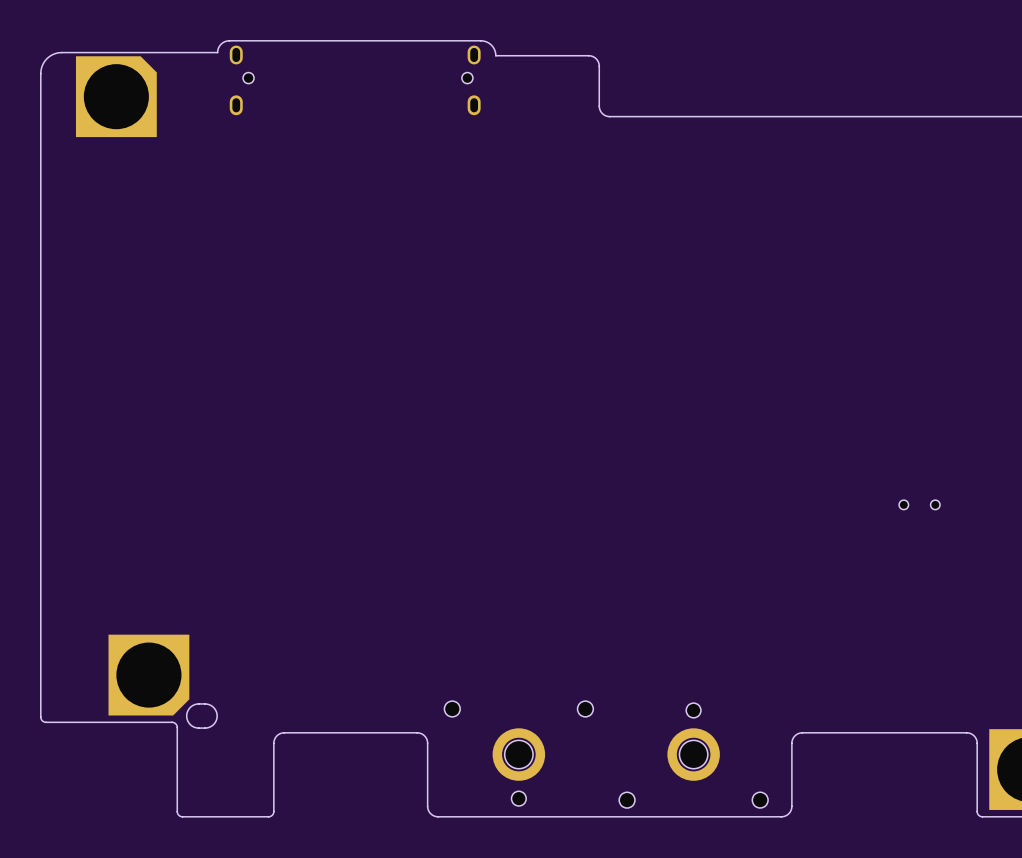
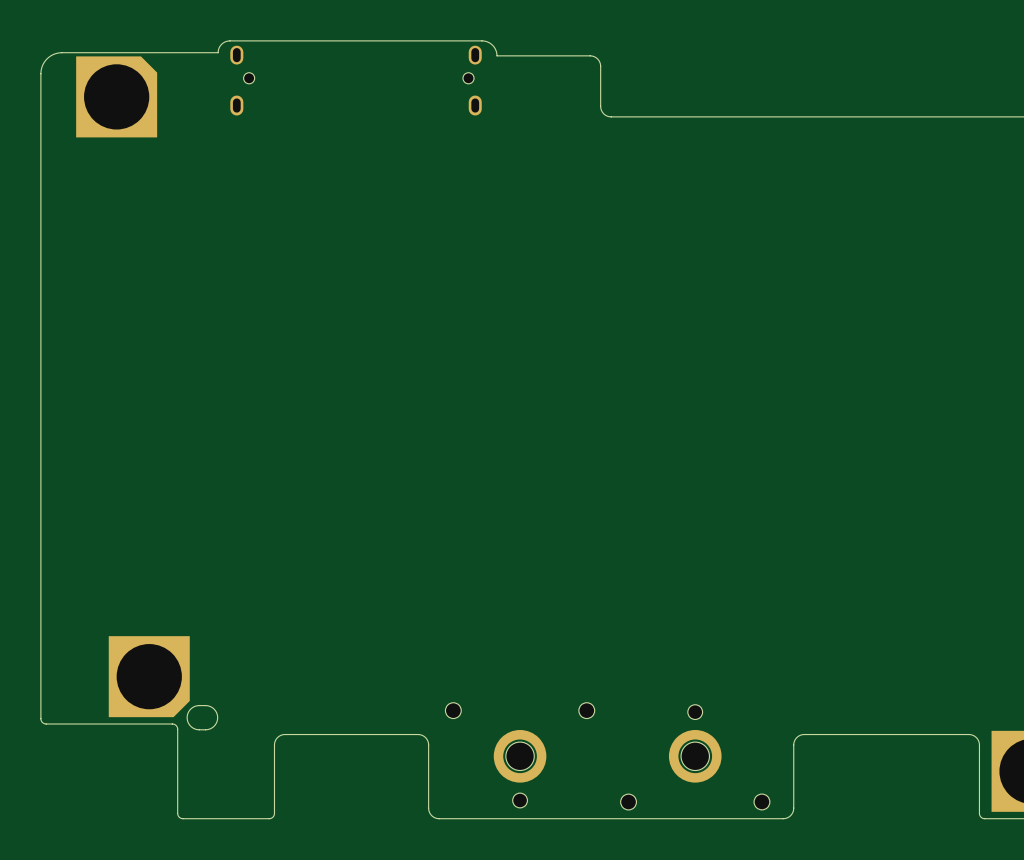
part: (919, 504) -> none

